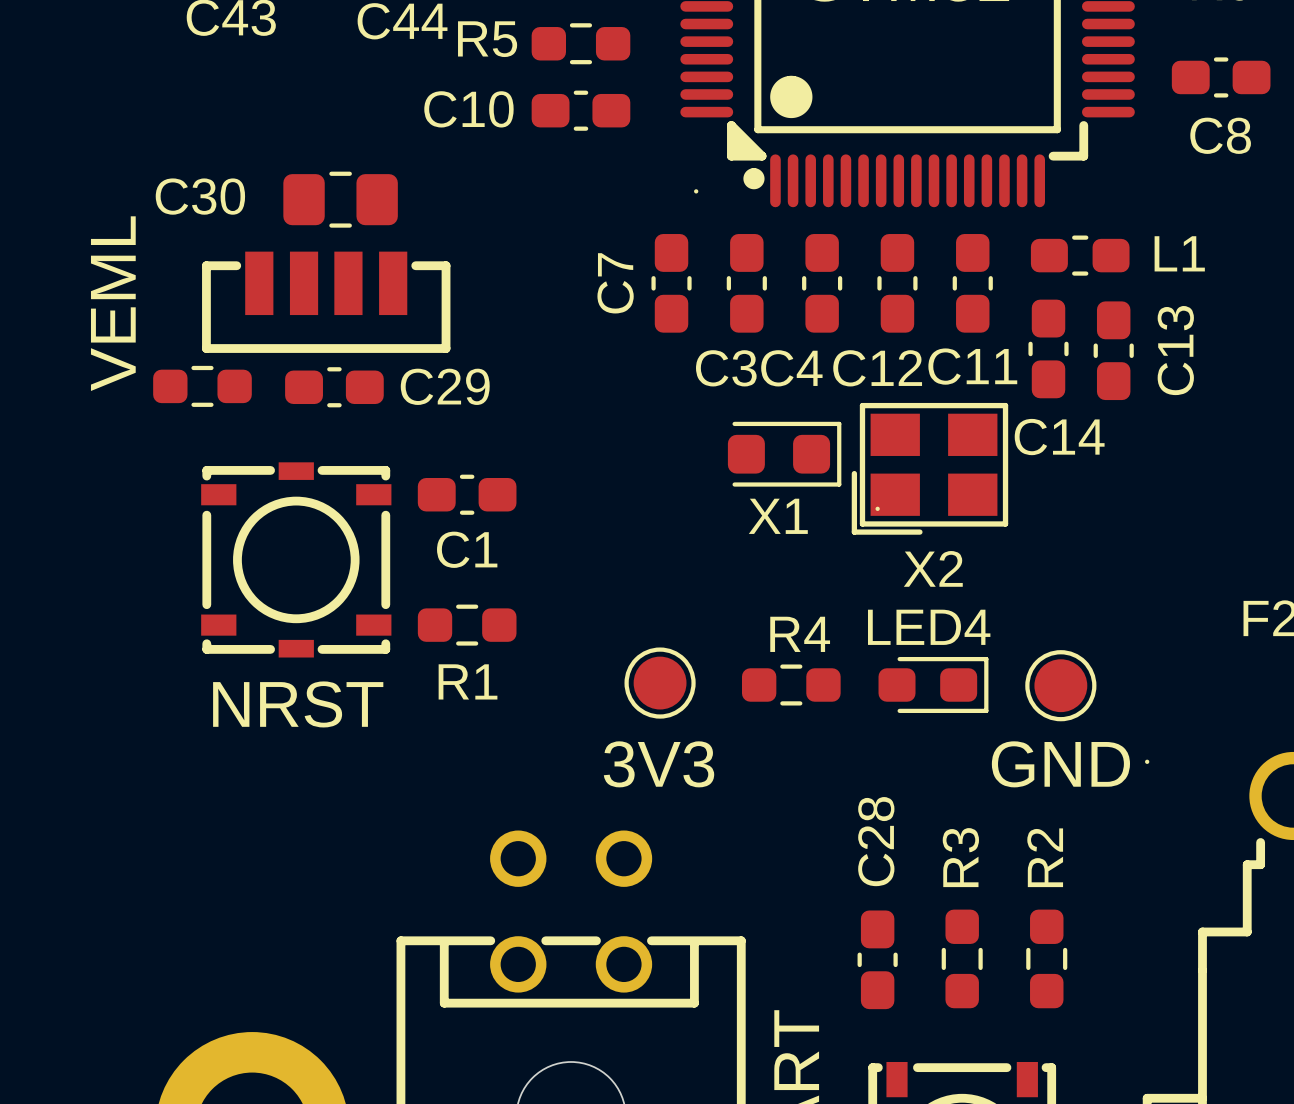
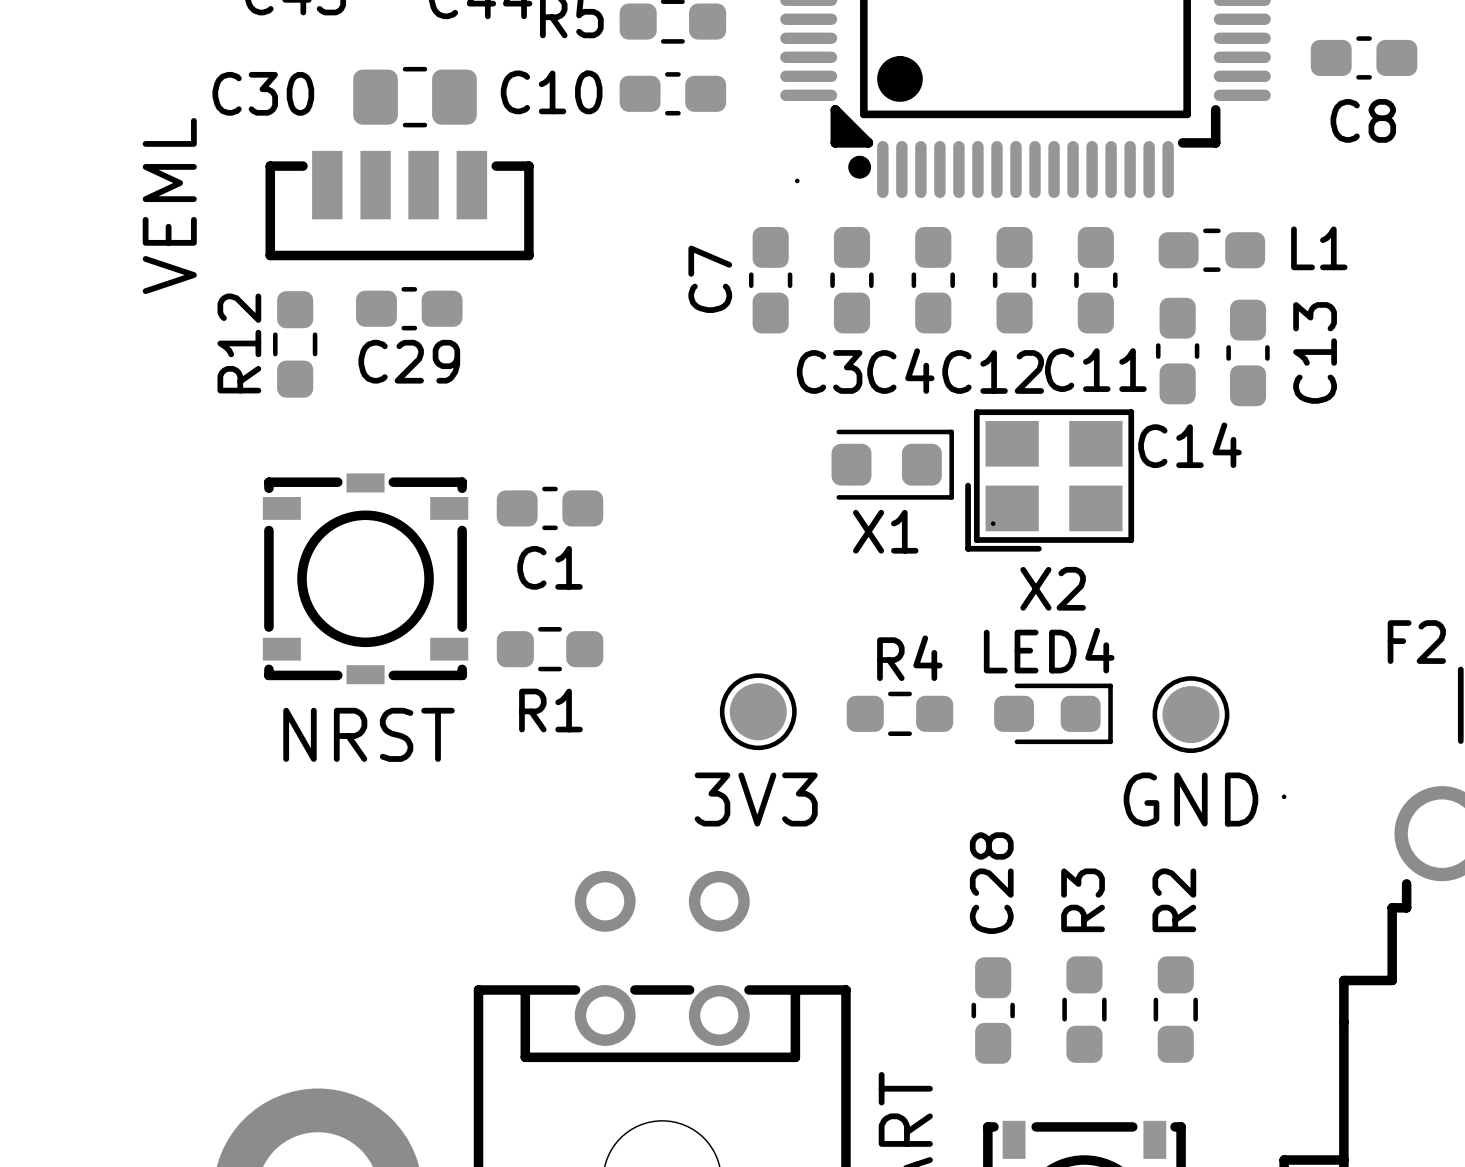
C30 position: (340, 199) -> (414, 97)
part position: (326, 302) -> (399, 205)
R12: none -> (295, 344)
part: (202, 386) -> none
C29 name position: C29 (445, 386) -> C29 (409, 361)
C29 position: (334, 387) -> (409, 308)

